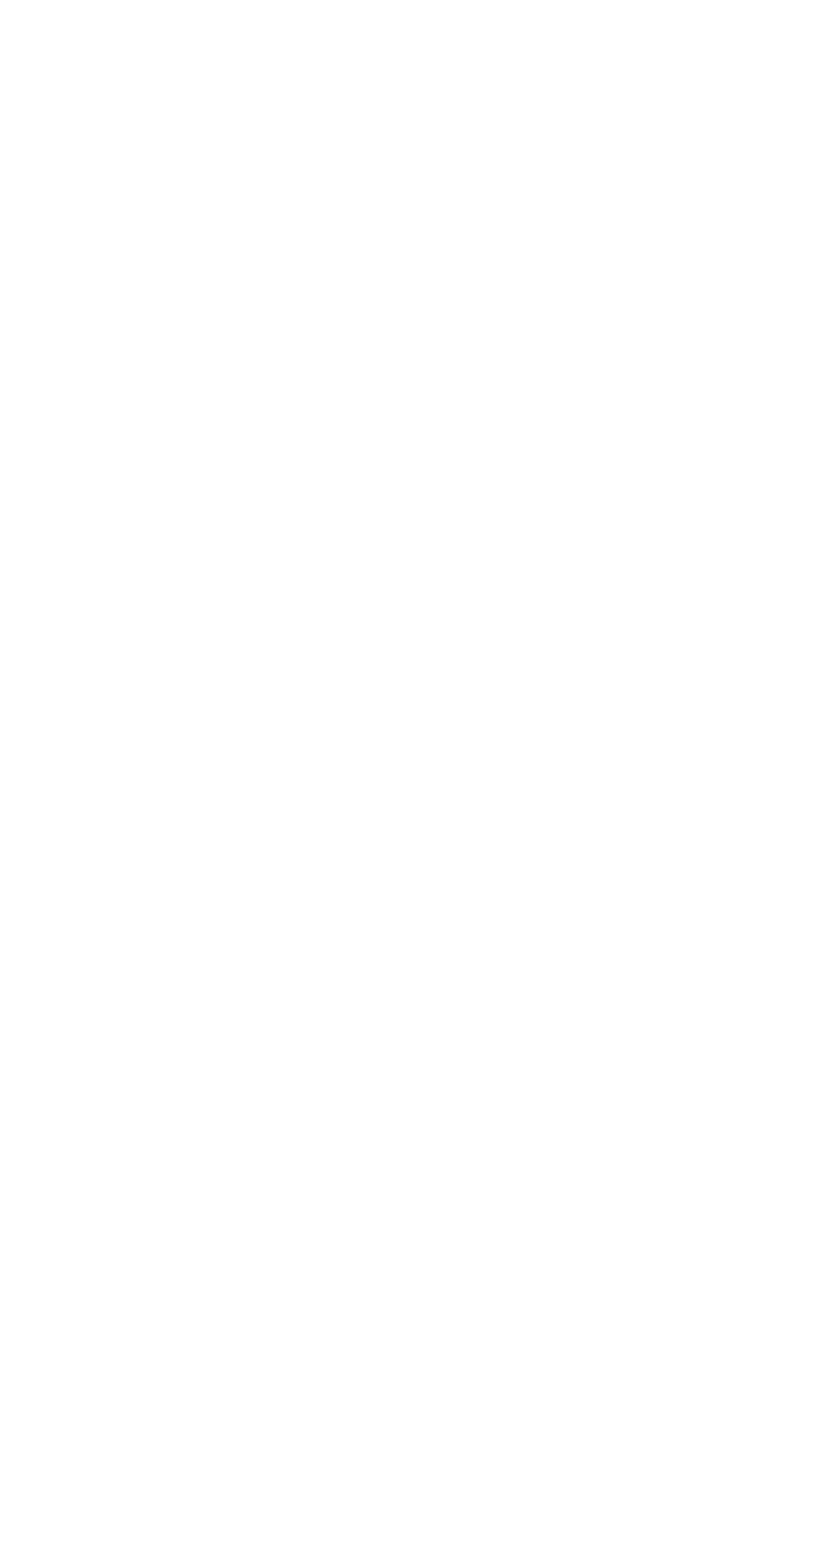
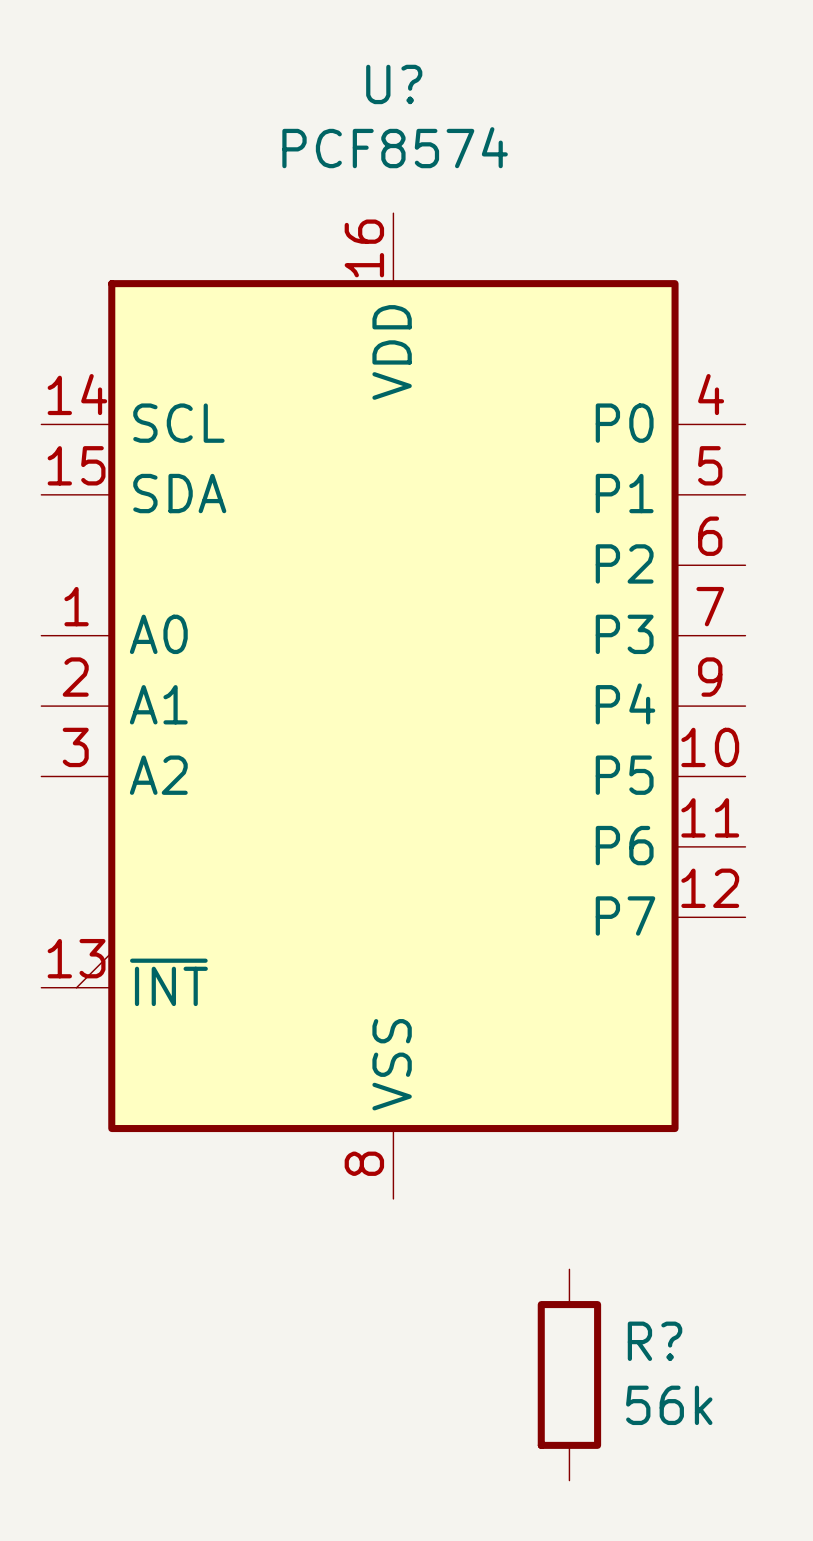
U?: none -> PCF8574 (393, 706)
R?: none -> 56k (569, 1374)

